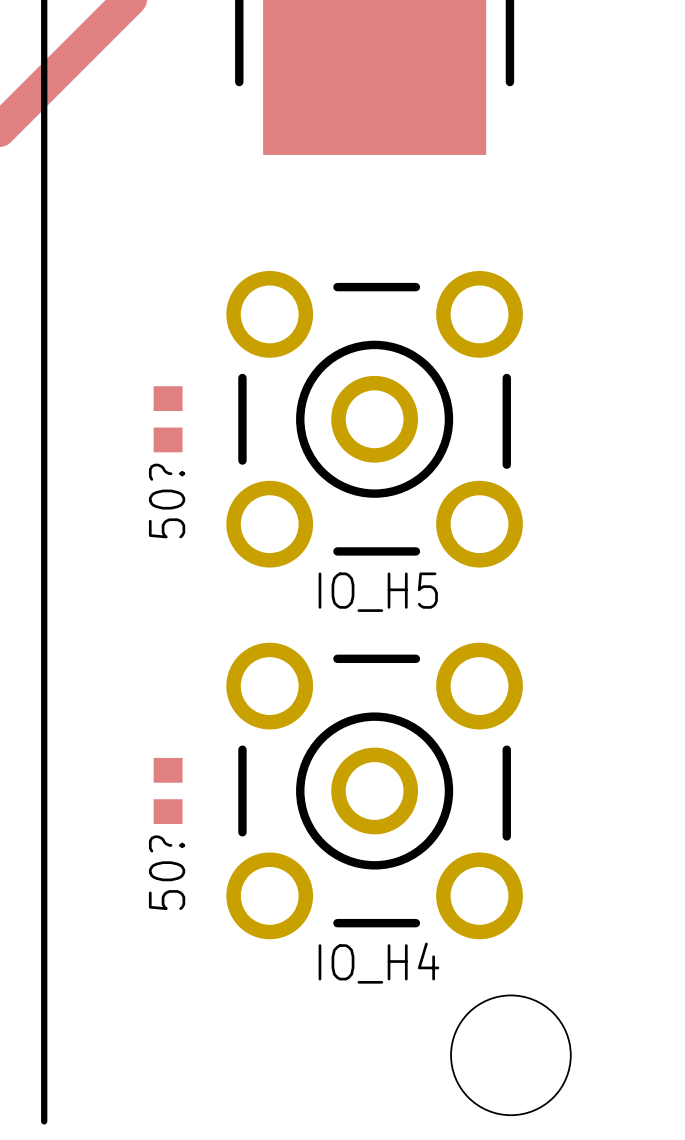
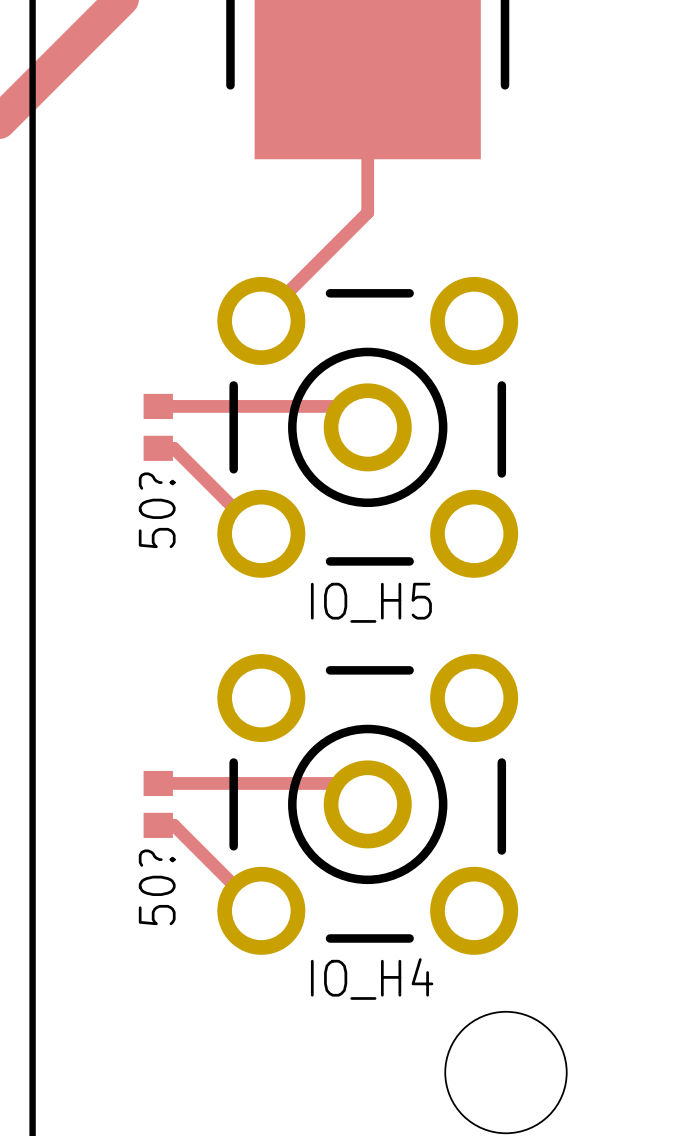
top track: none -> (367, 29) (367, 212) (261, 320)
top track: none -> (158, 406) (346, 406) (367, 427)
top track: none -> (158, 448) (173, 448) (261, 533)
top track: none -> (158, 783) (346, 783) (367, 804)
top track: none -> (158, 825) (173, 825) (261, 910)

